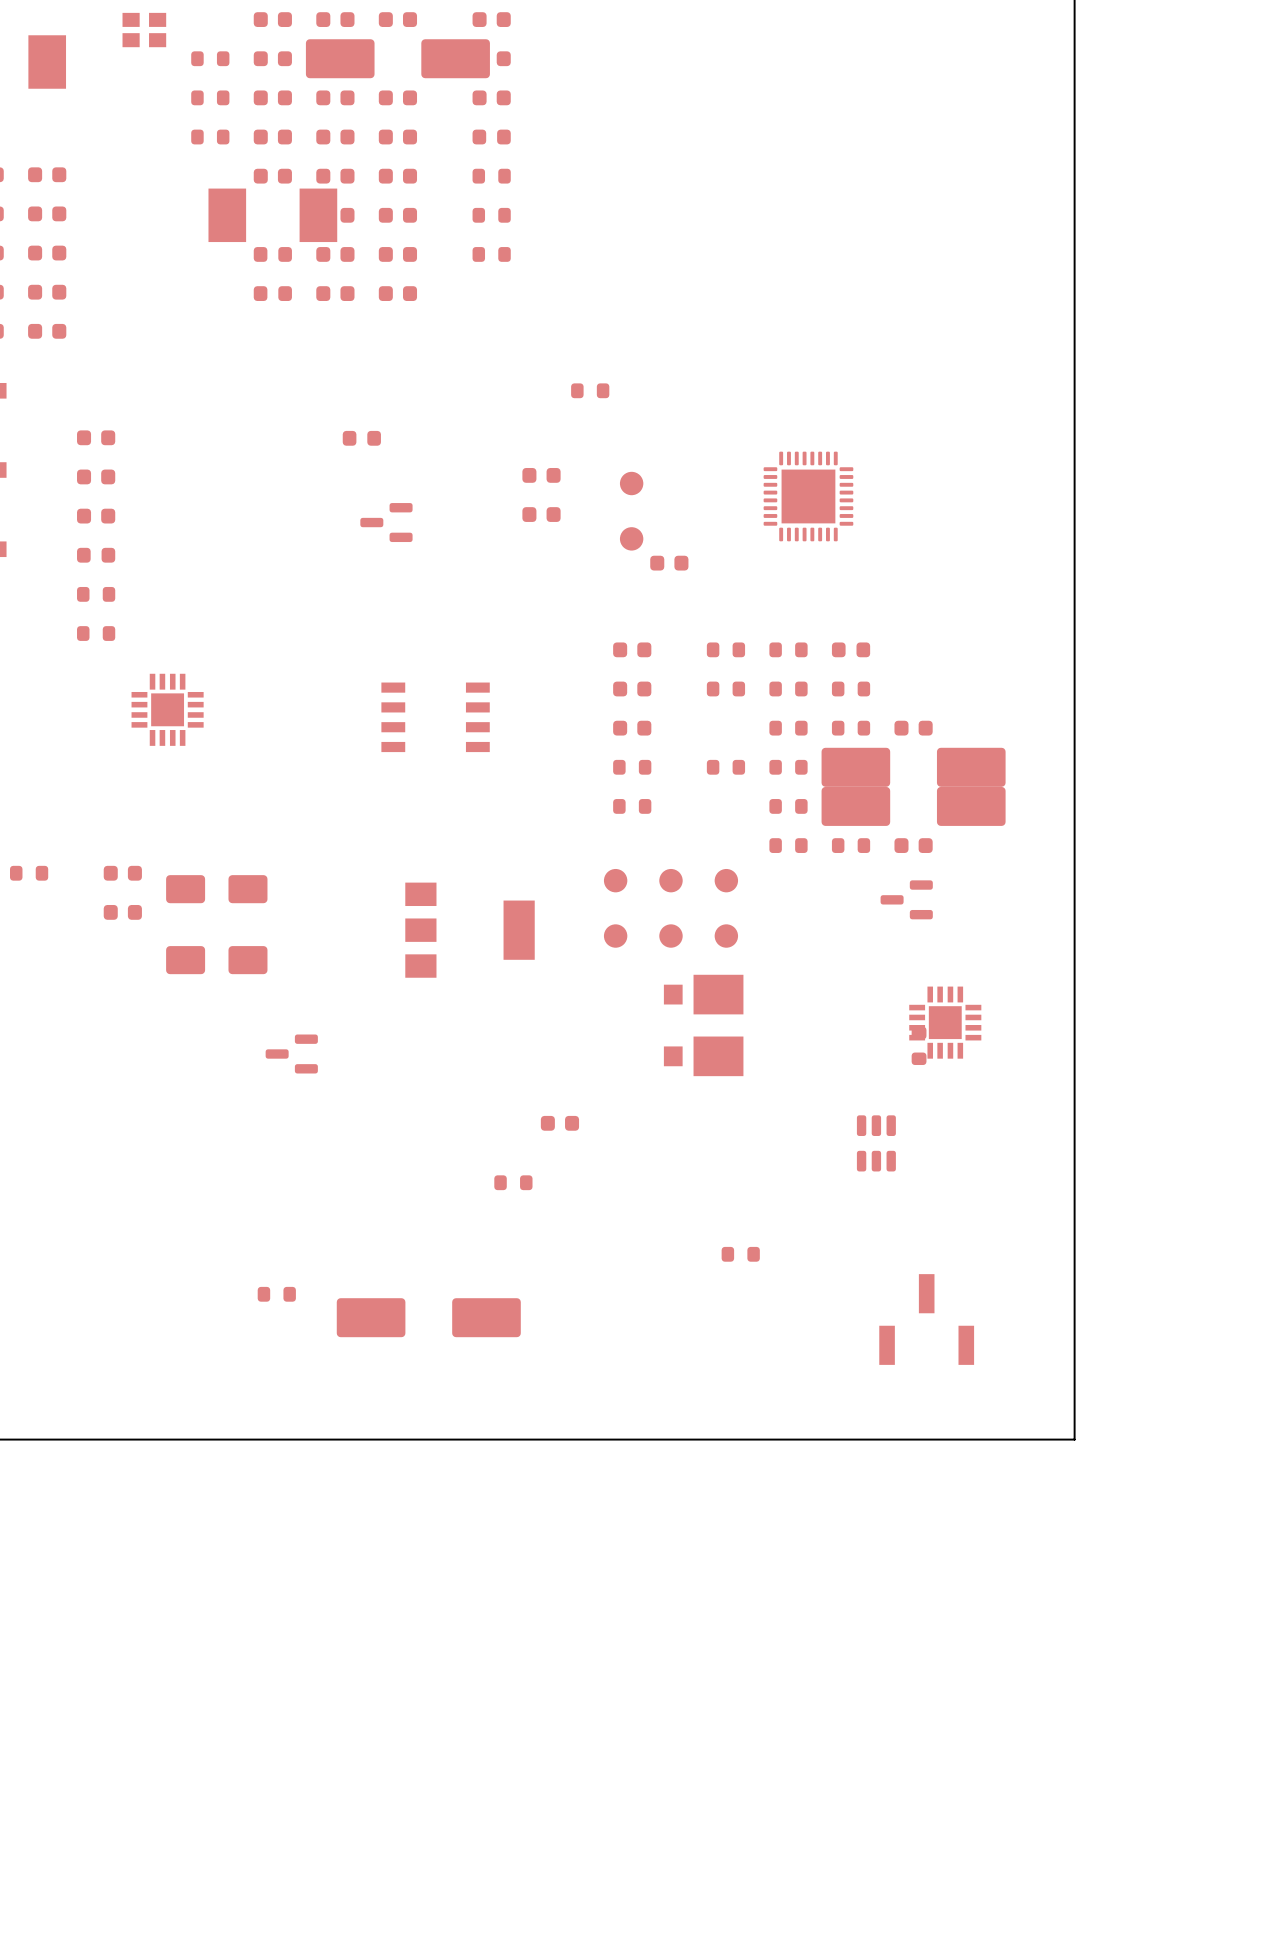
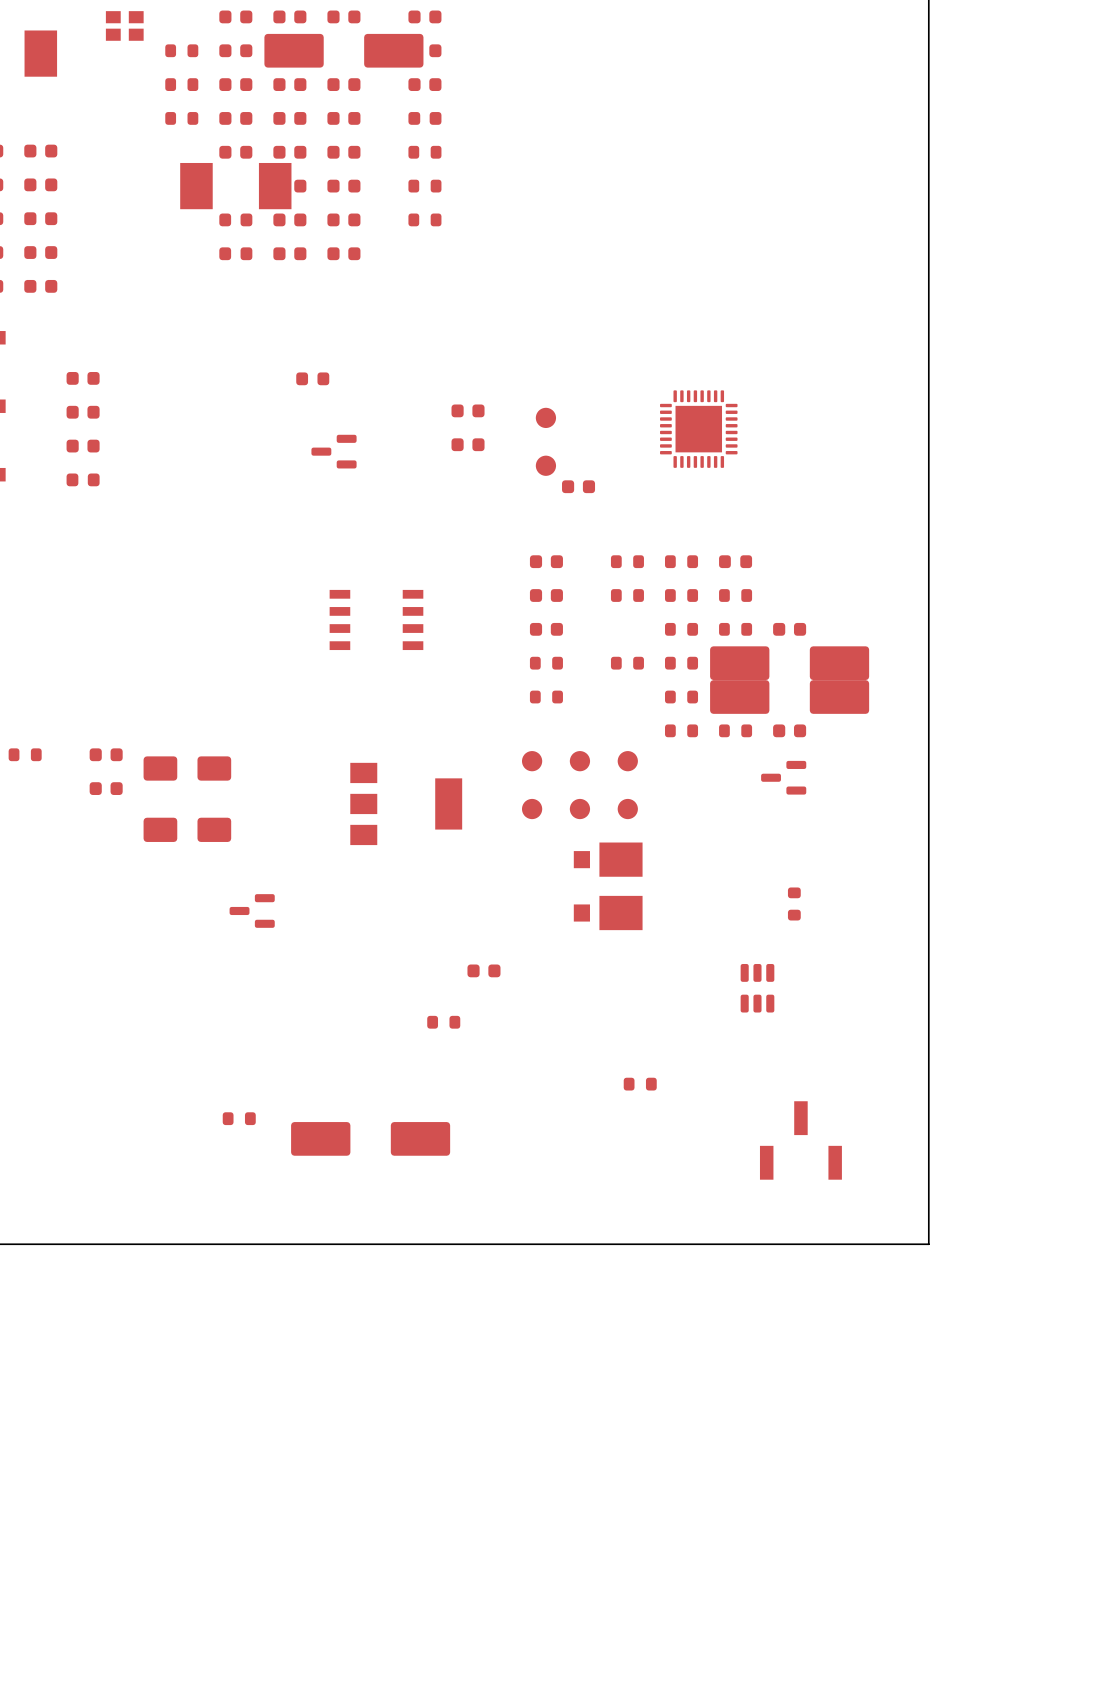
part: (590, 390) -> none
part: (96, 594) -> none
part: (96, 633) -> none
part: (167, 709) -> none
part: (945, 1022) -> none

